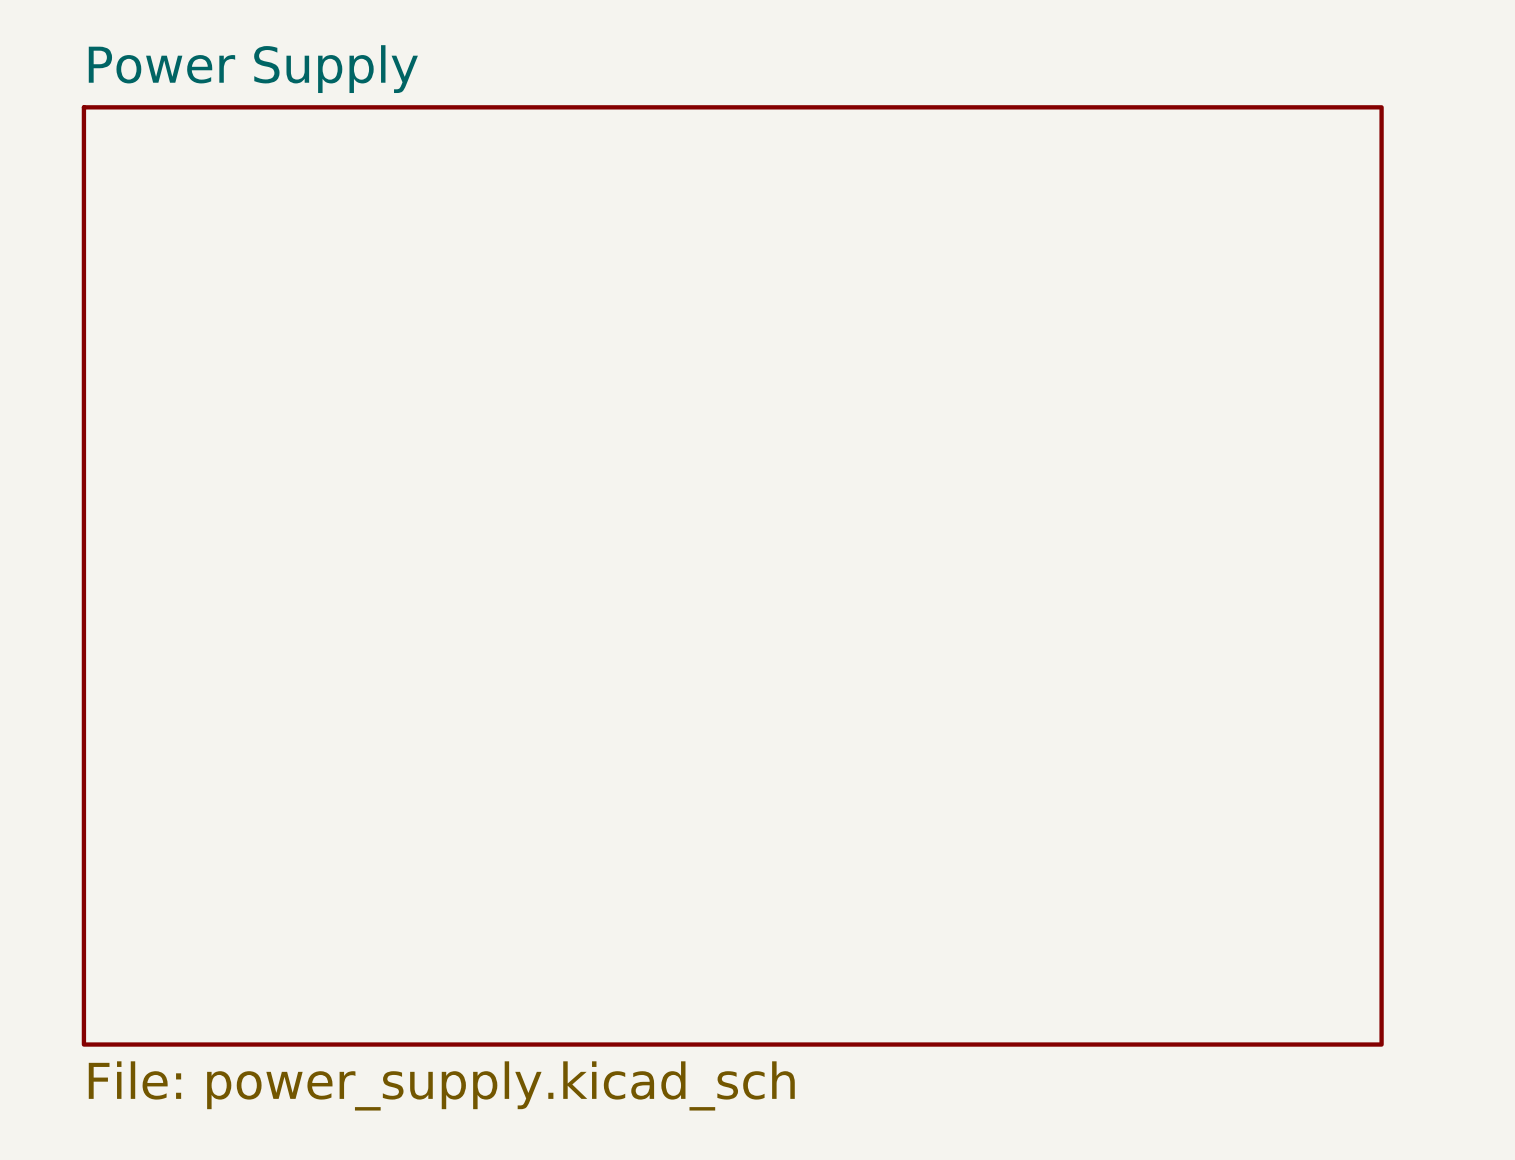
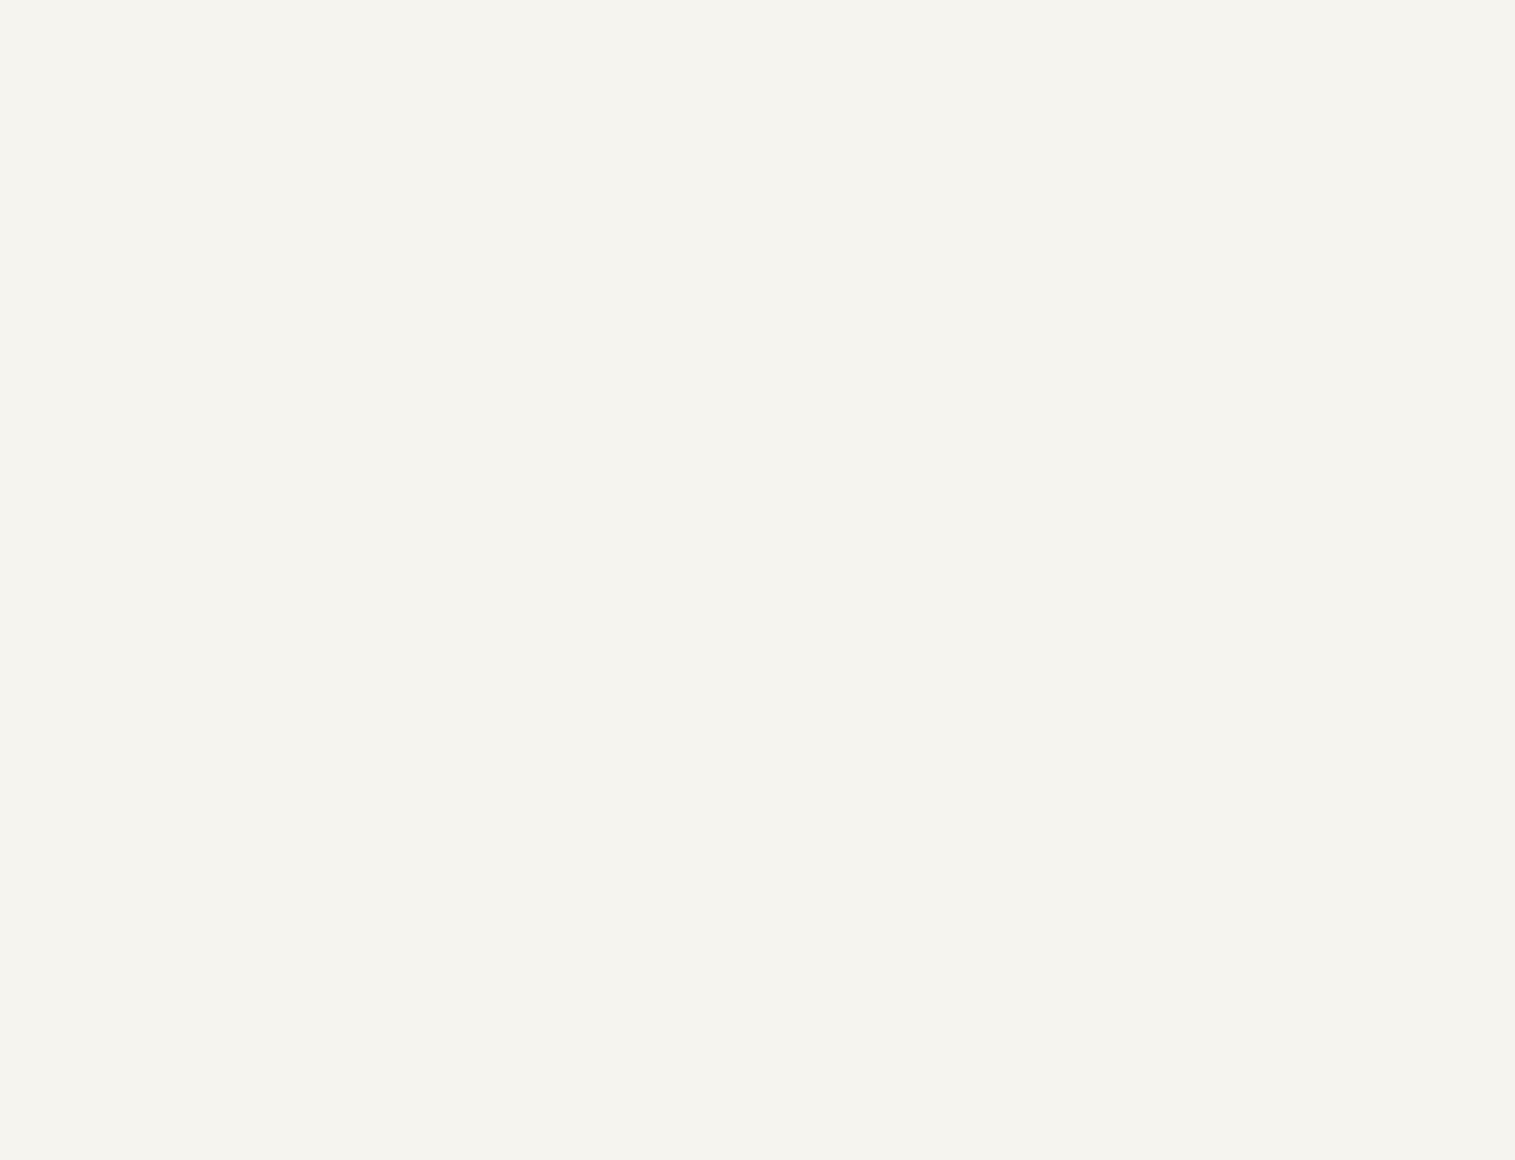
sheet Power Supply: File: power_supply.kicad_sch (732, 575) -> none

